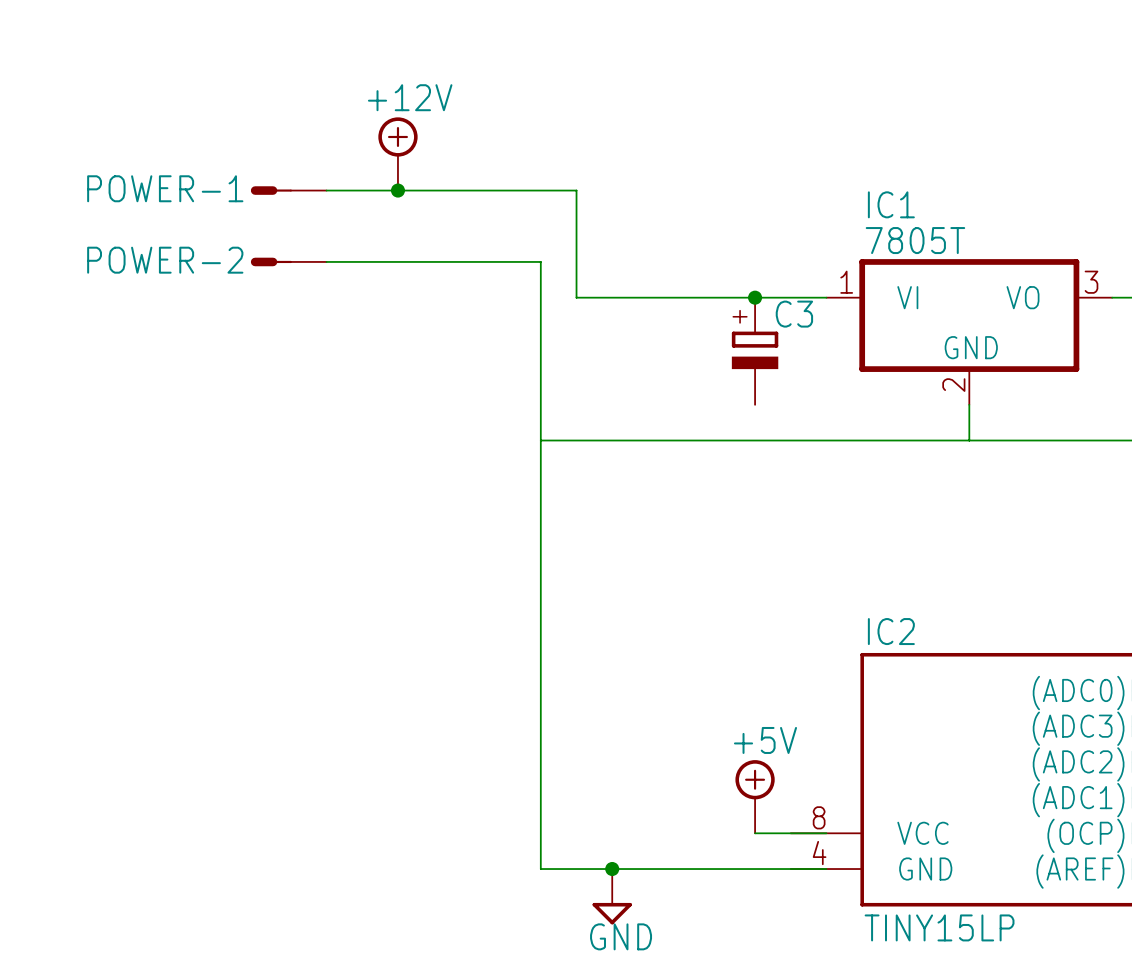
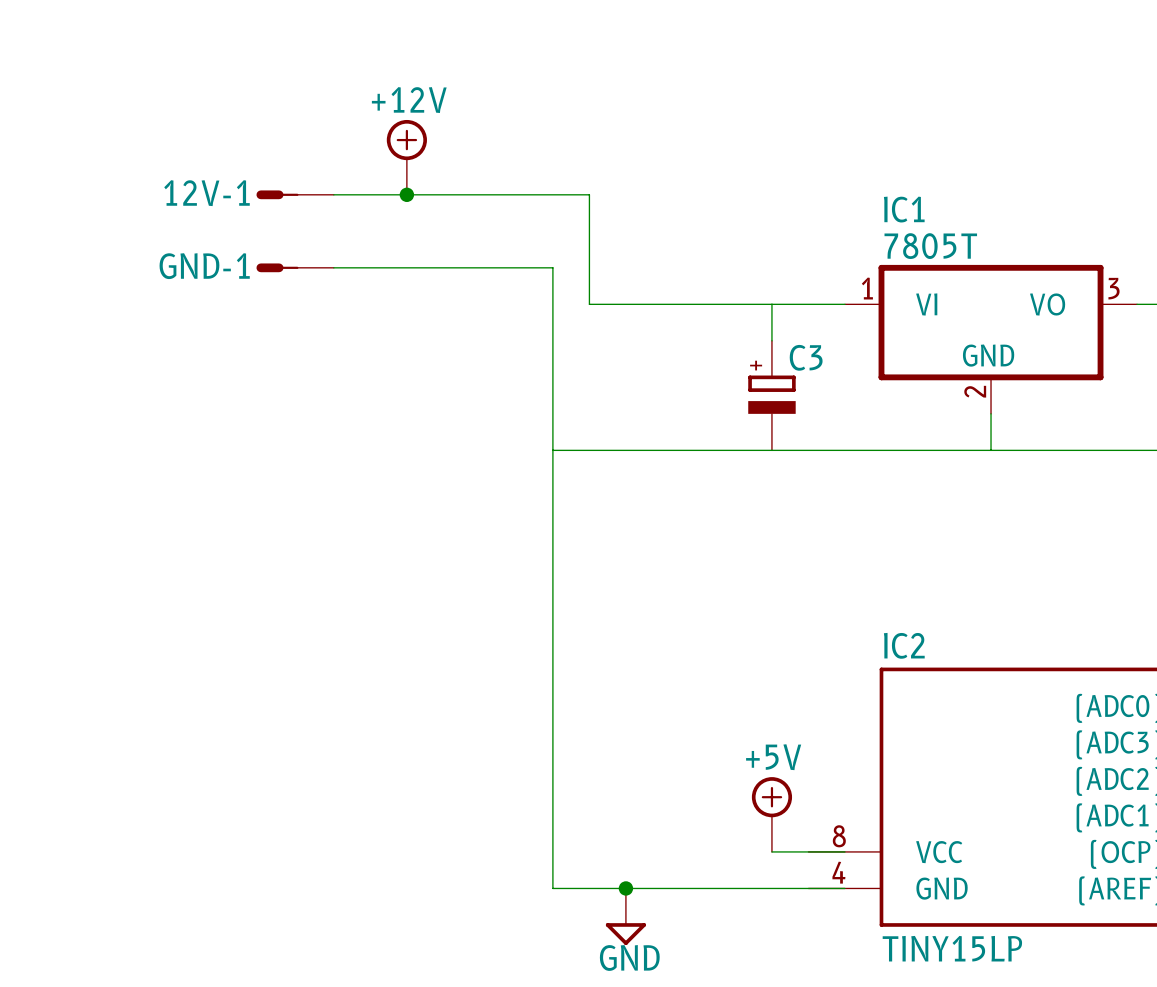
POWER-1 name: POWER-1 (165, 188) -> 12V-1 (207, 193)
POWER-2 name: POWER-2 (165, 260) -> GND-1 (204, 266)
junction: (755, 297) -> none
C3 position: (755, 351) -> (771, 395)

